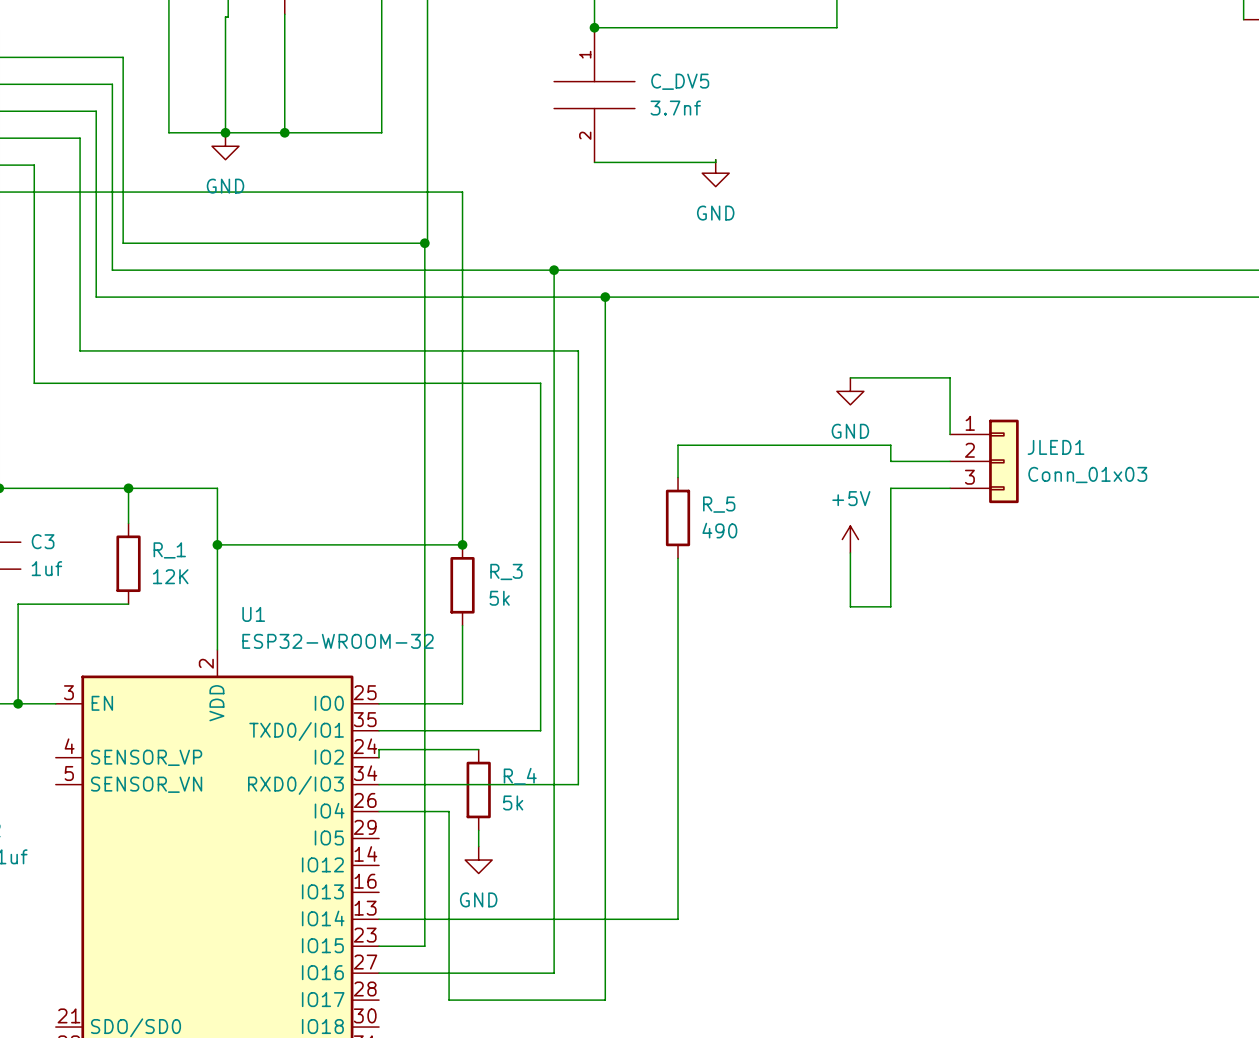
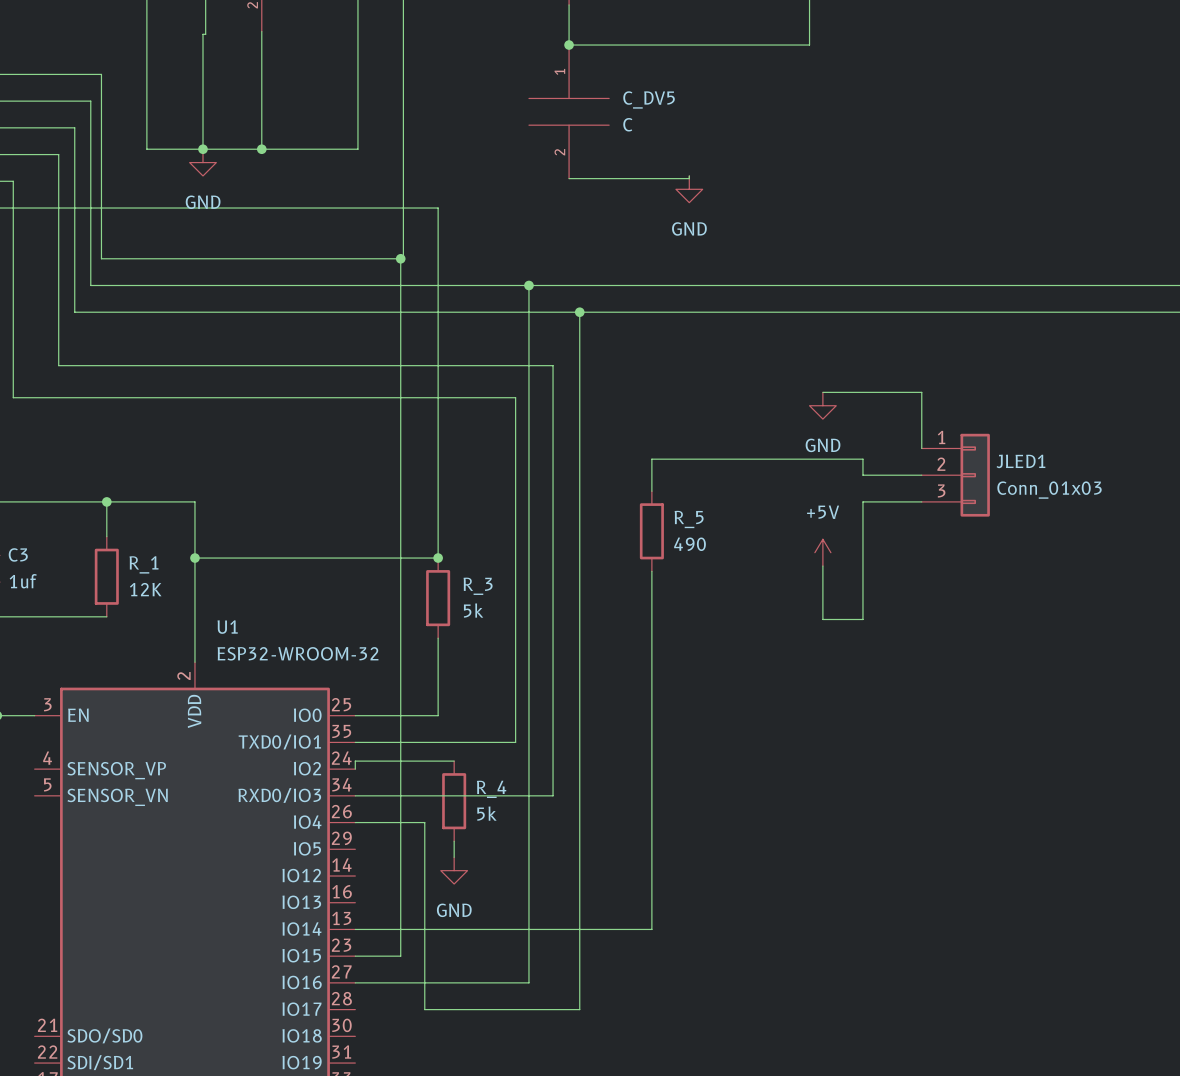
C_DV5 value: 3.7nf (675, 108) -> C (627, 124)

